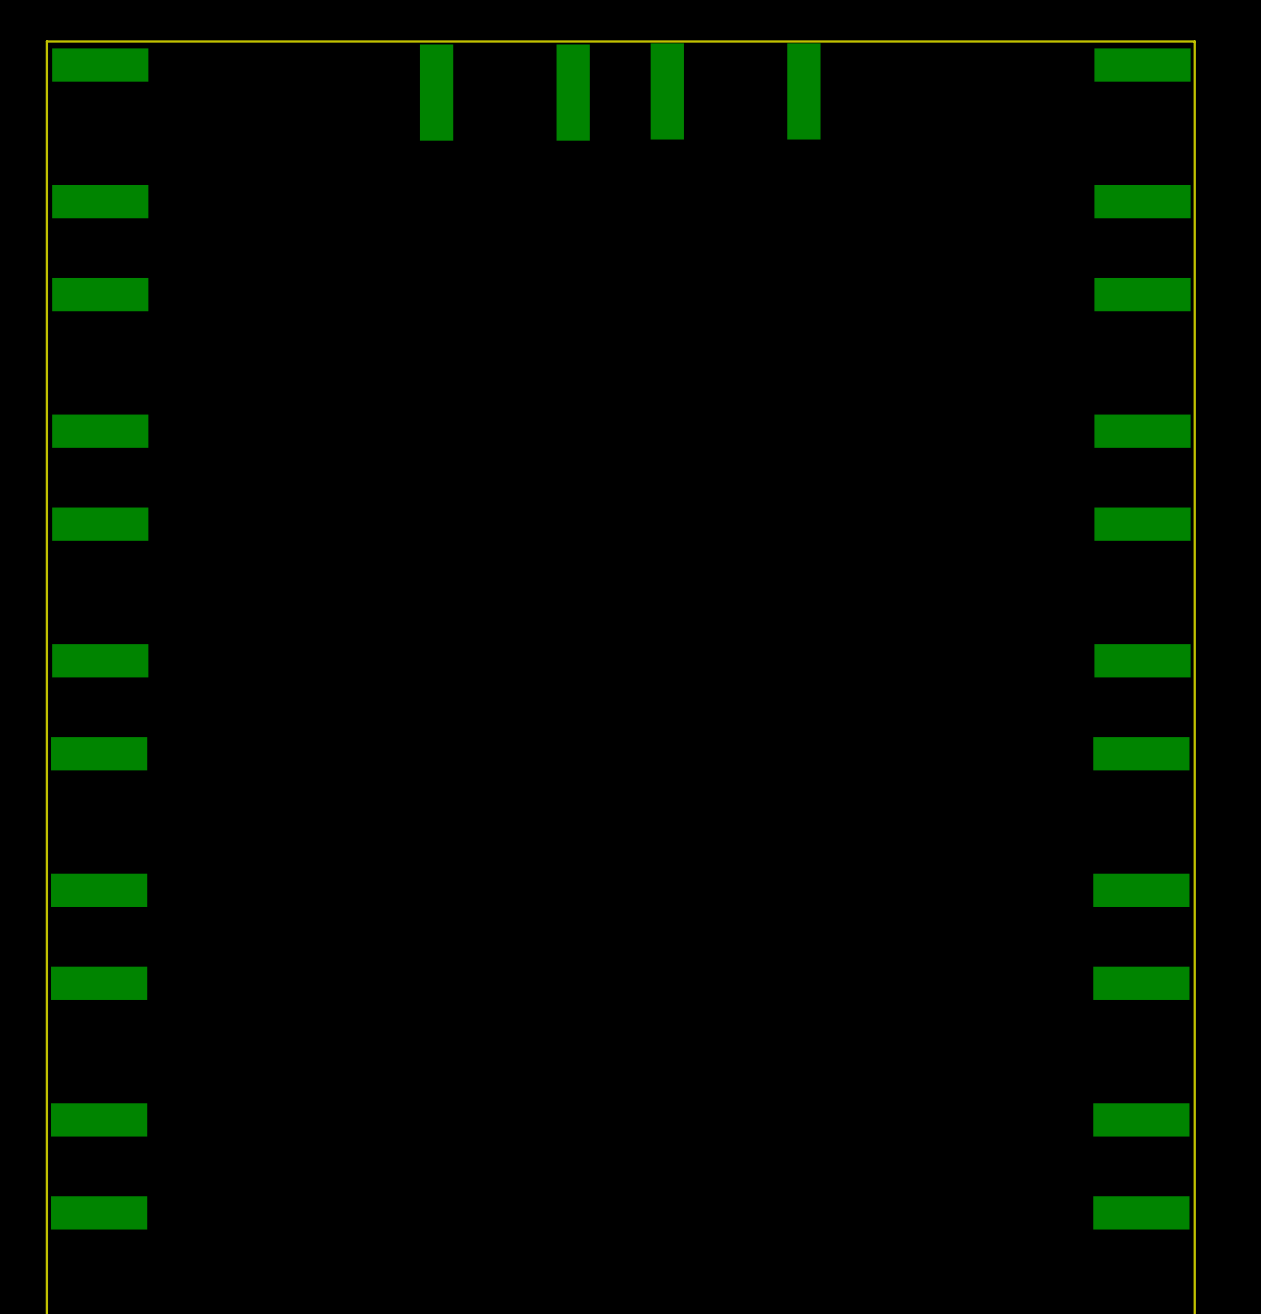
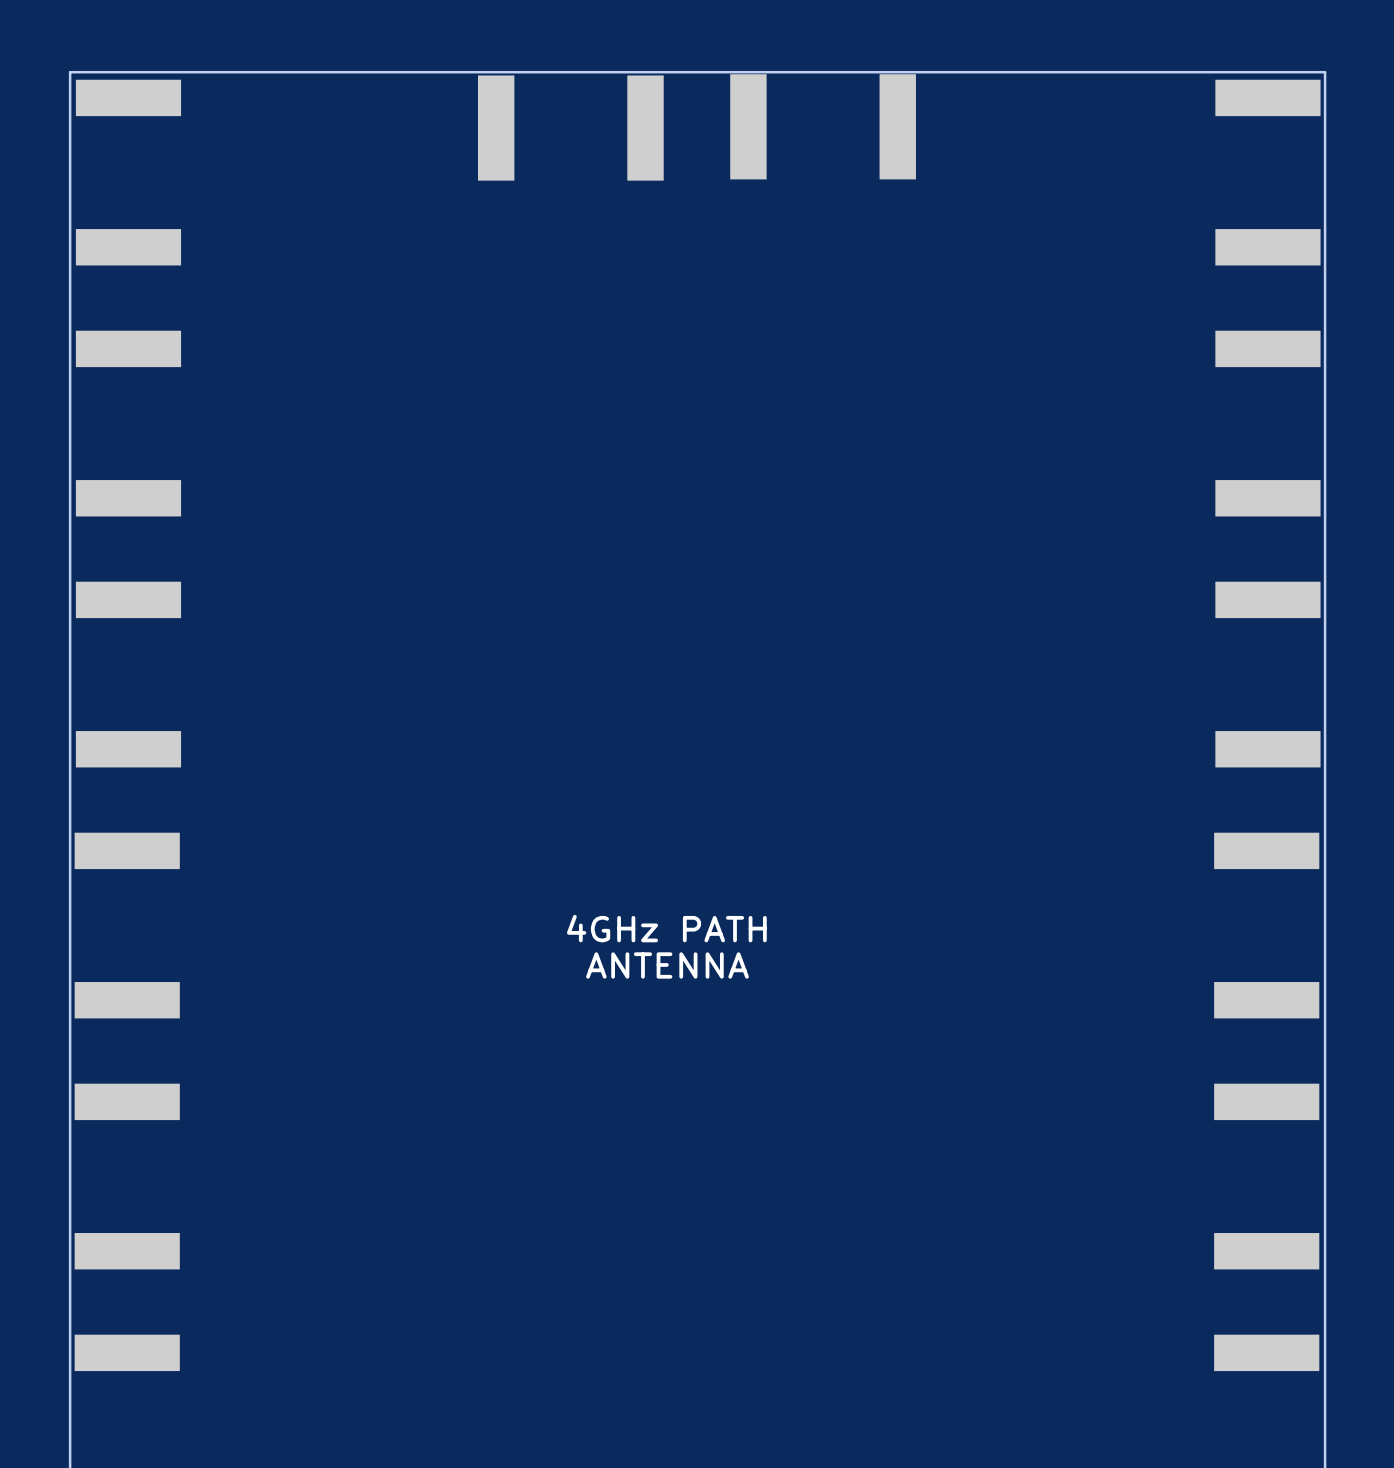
text: none -> 4GHz PATH (666, 928)
text: none -> ANTENNA (667, 965)

